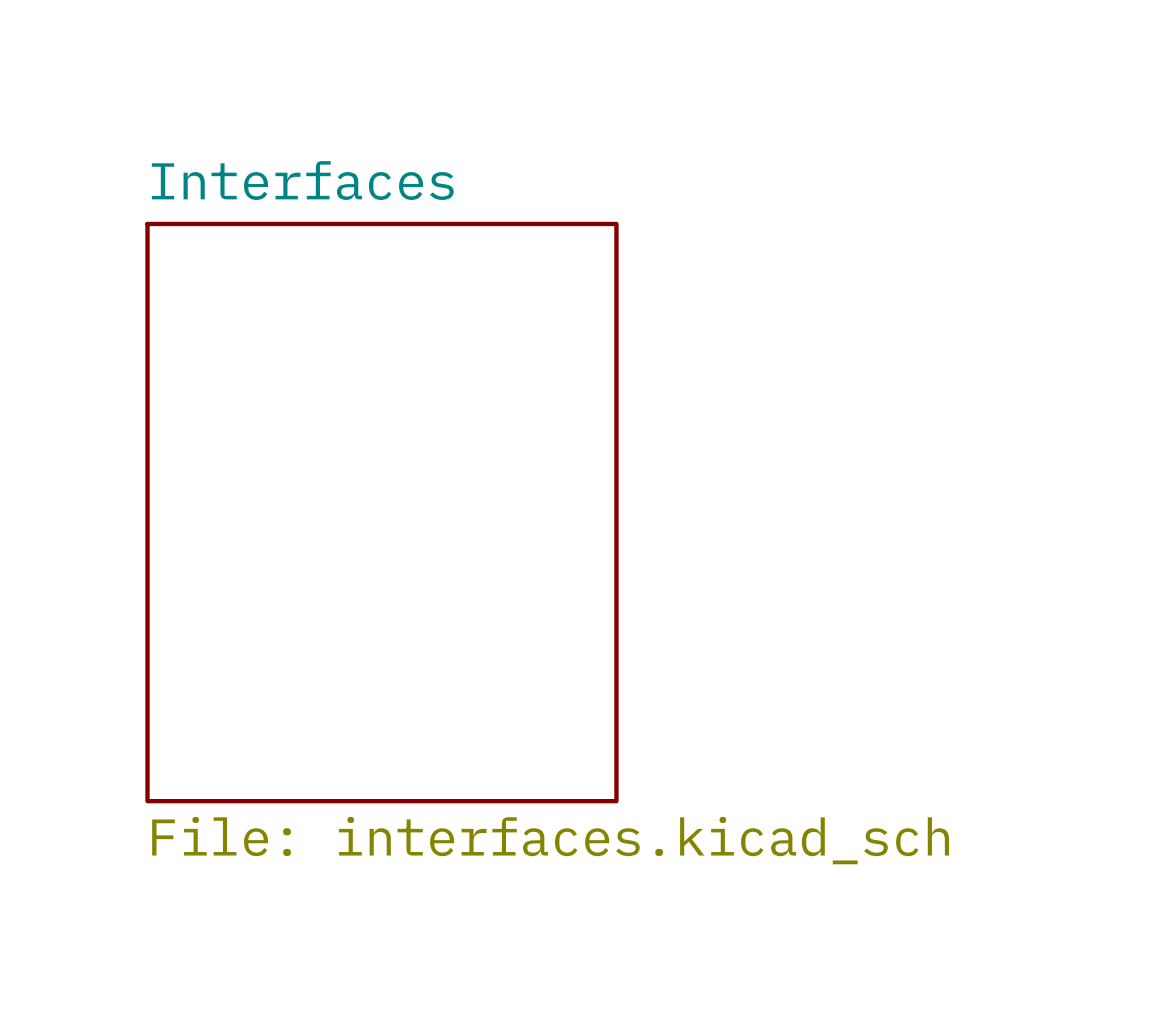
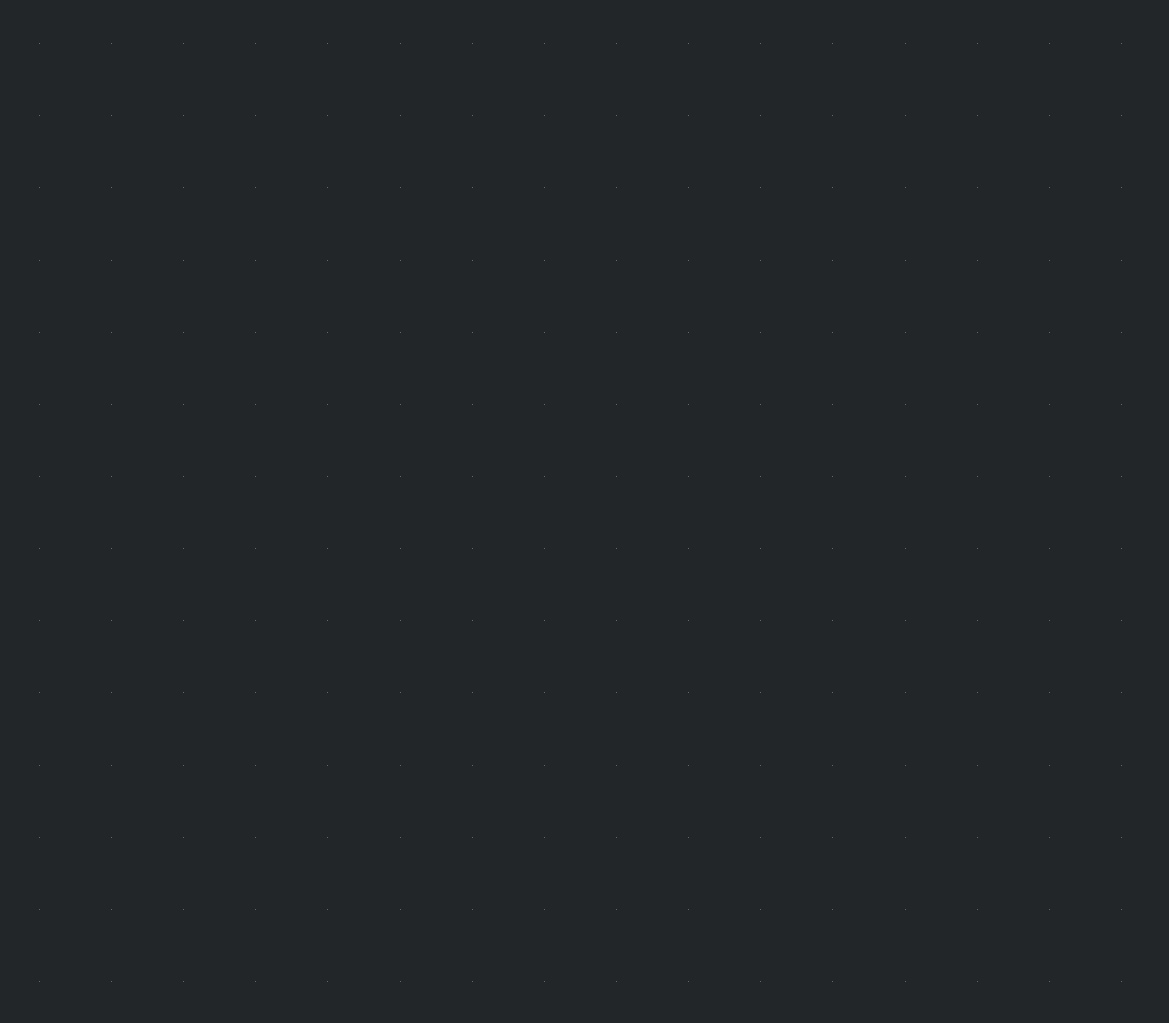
sheet Interfaces: File: interfaces.kicad_sch (381, 512) -> none

